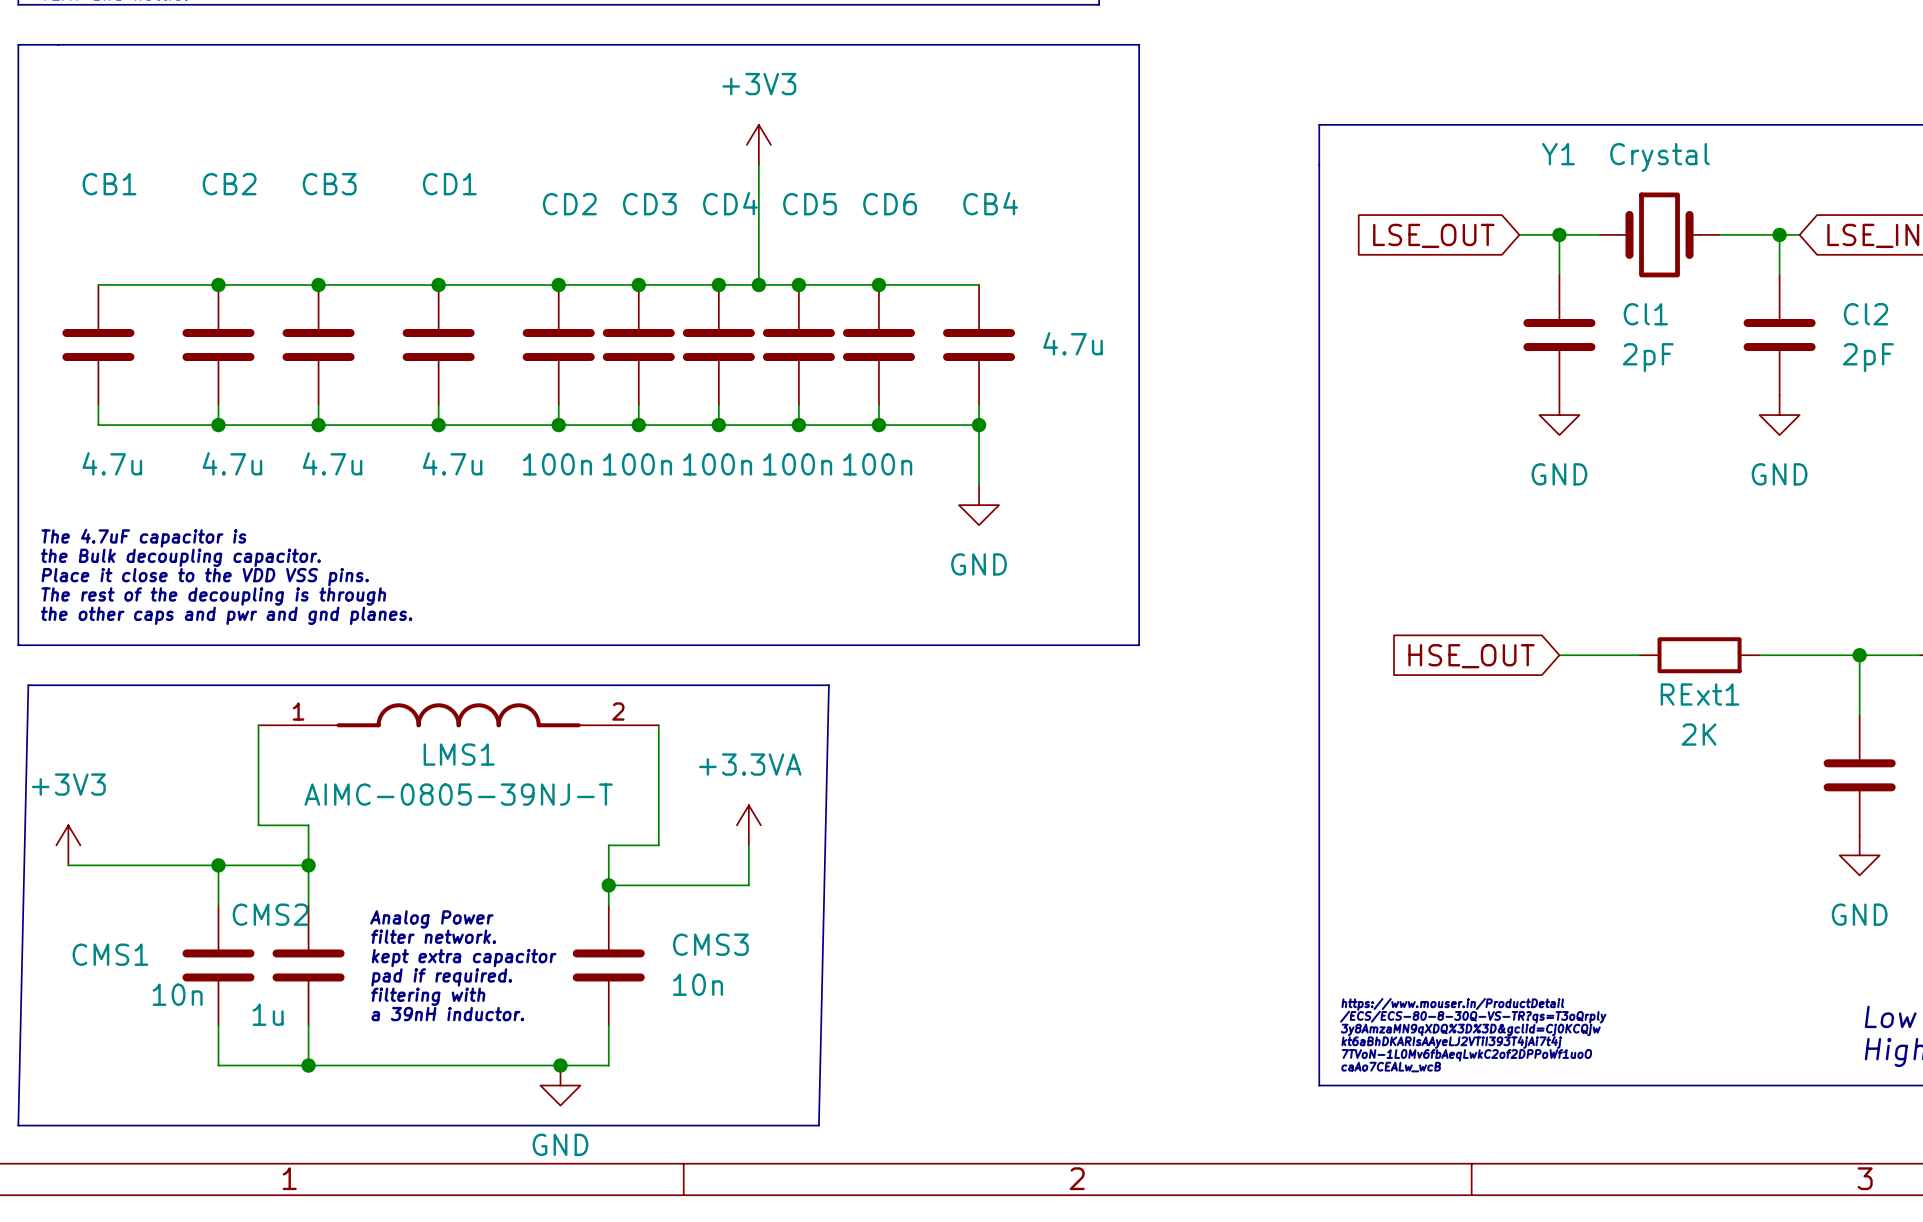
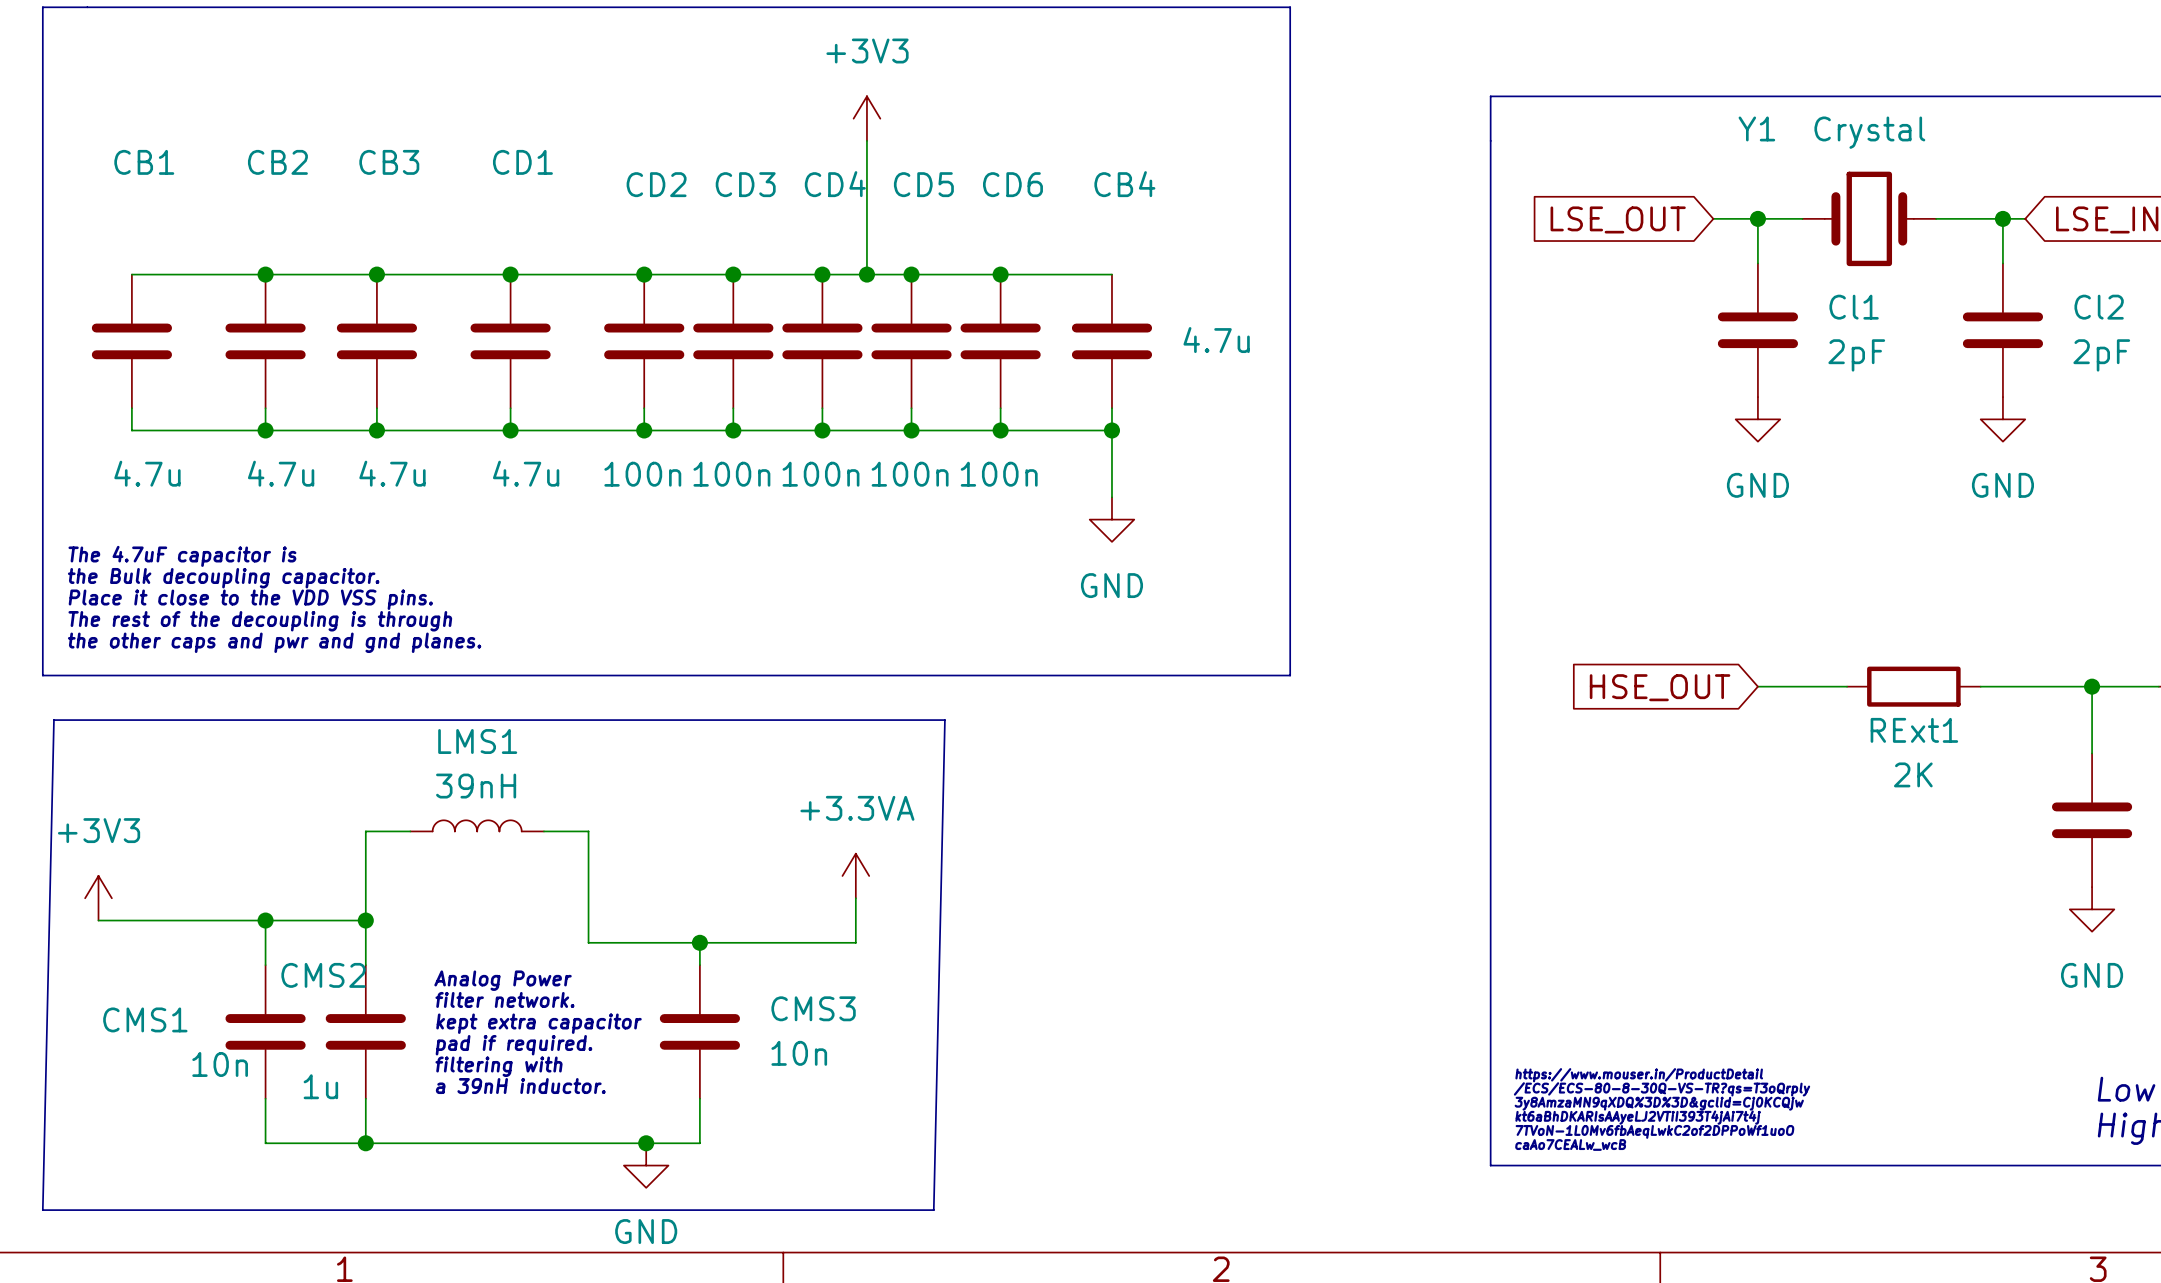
LMS1 symbol: [258, 703, 659, 728] -> [410, 820, 544, 832]
wire: (258, 725) (258, 825) (308, 825) -> (410, 831) (365, 831) (365, 875)
wire: (658, 725) (658, 845) (608, 845) (608, 885) -> (543, 831) (588, 831) (588, 942) (699, 942)
LMS1 name position: LMS1 (459, 754) -> LMS1 (477, 741)
LMS1 value: AIMC-0805-39NJ-T (458, 794) -> 39nH (476, 786)

